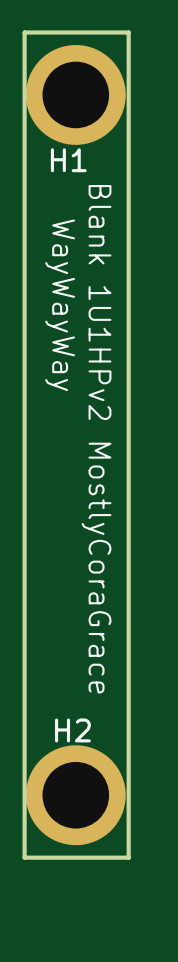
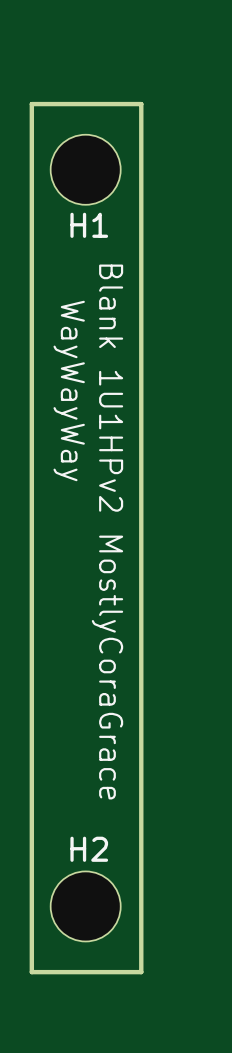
H1 footprint: [25, 44, 126, 145] -> [50, 134, 121, 205]
H2 footprint: [25, 745, 126, 846] -> [50, 871, 121, 942]

